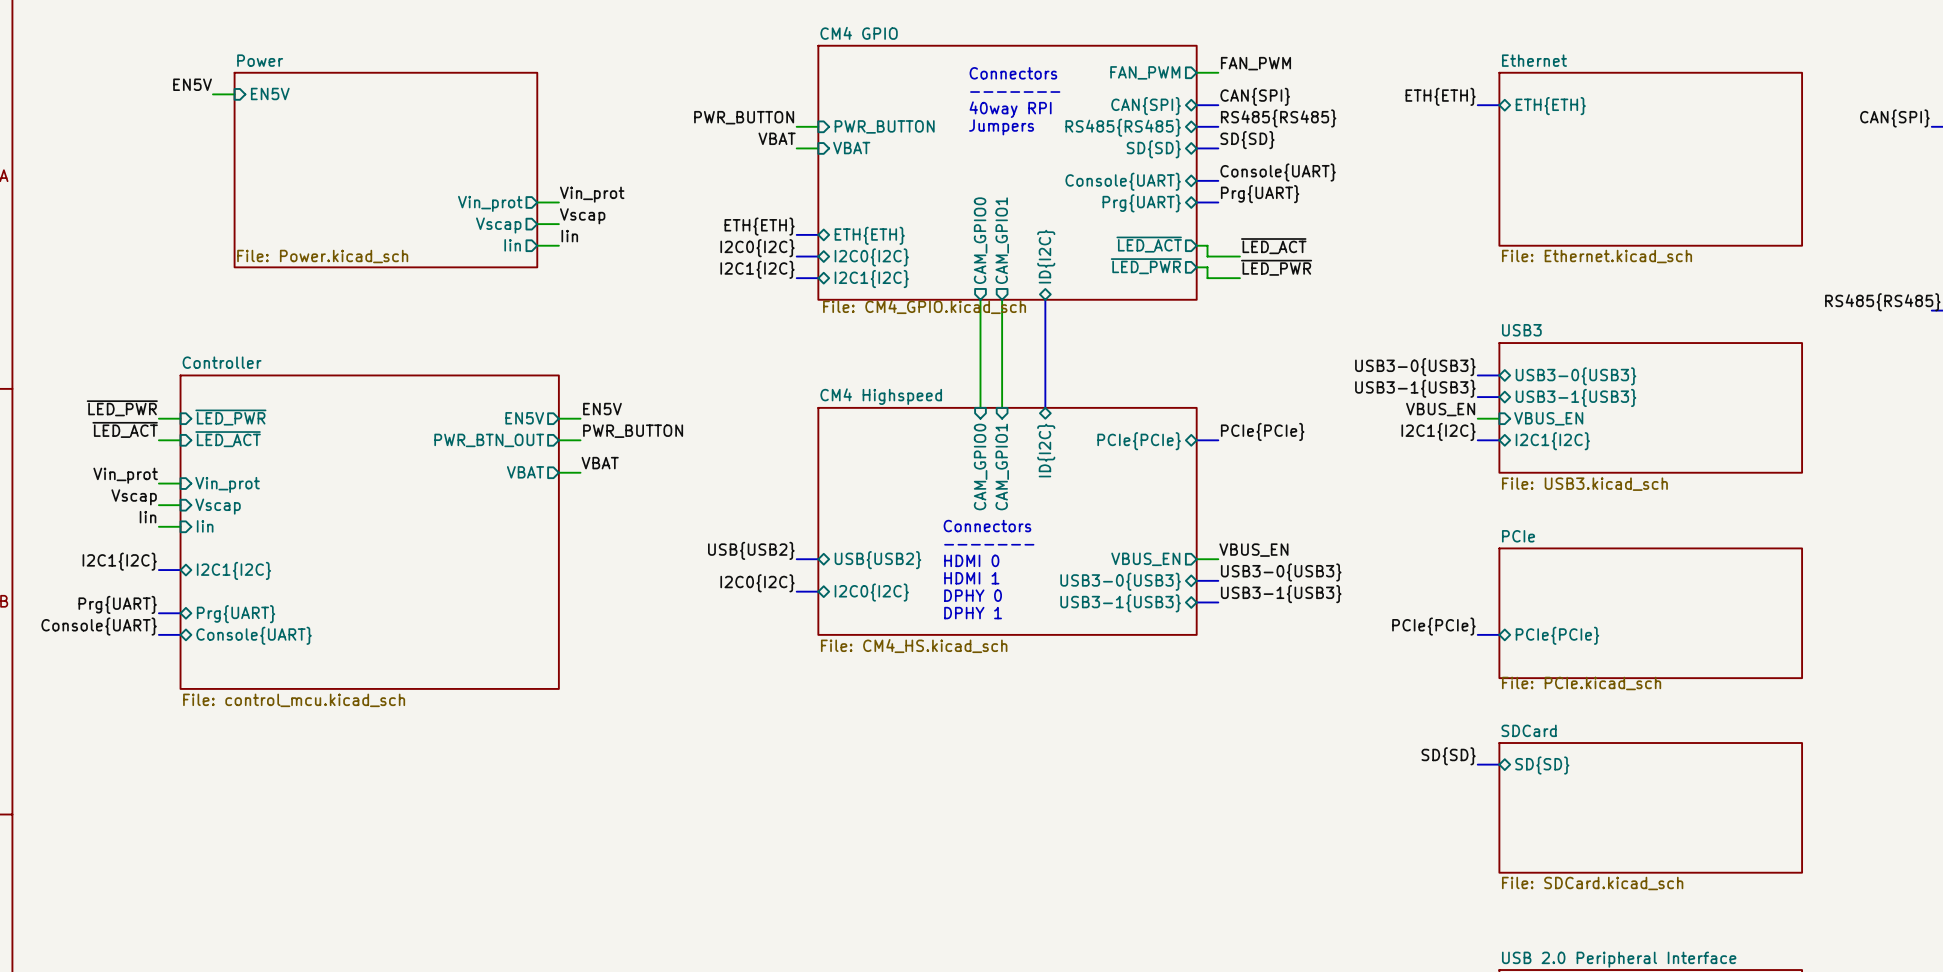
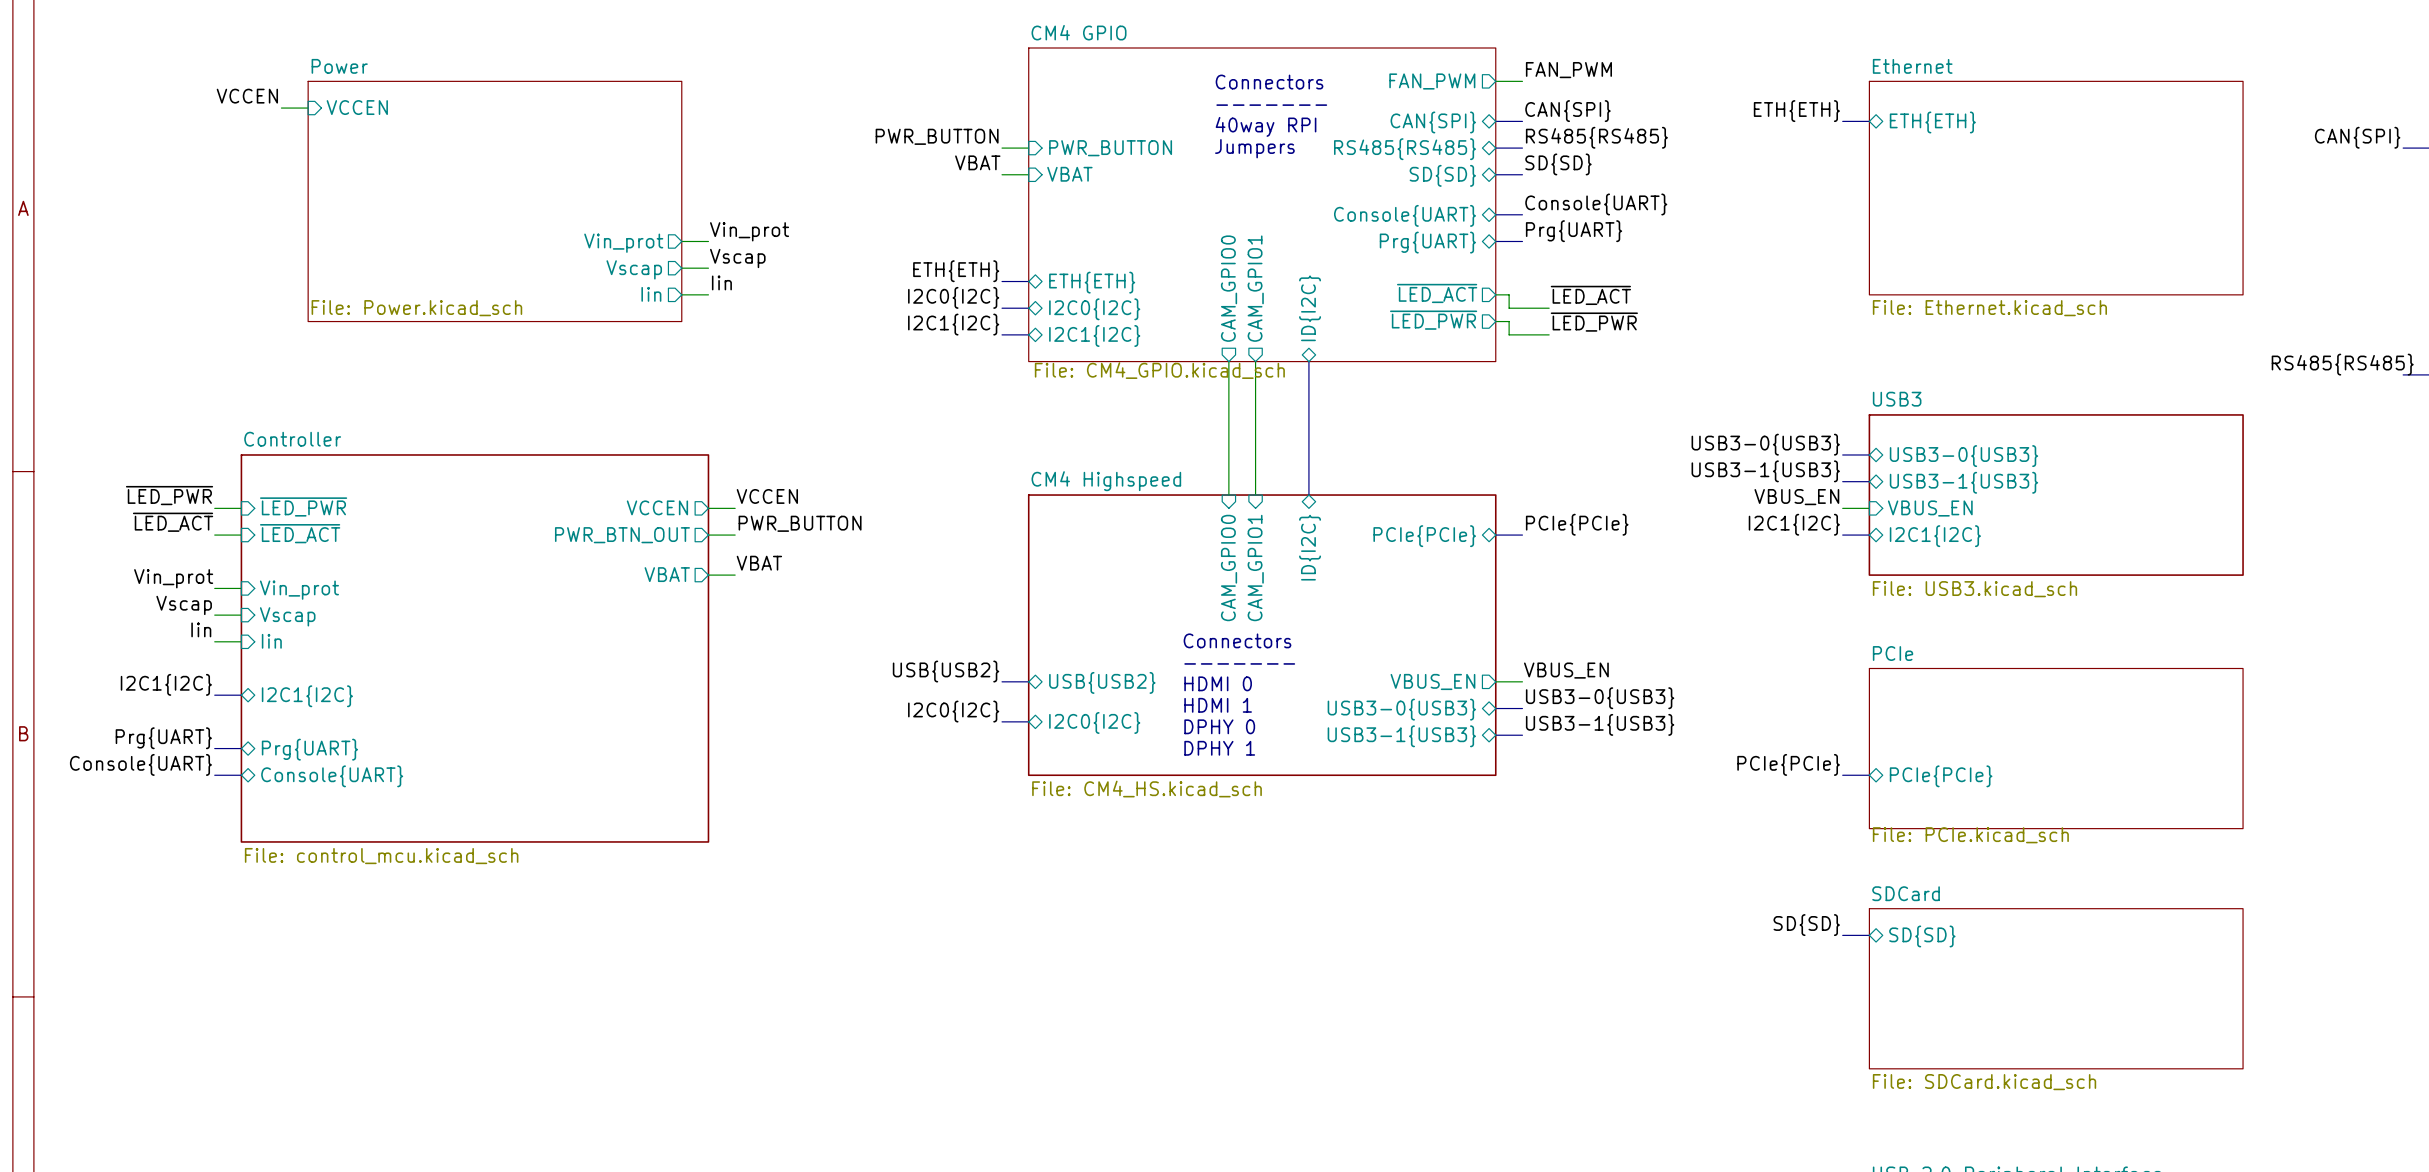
label: EN5V (192, 84) -> VCCEN (247, 96)
sheet pin: EN5V (270, 93) -> VCCEN (357, 107)
label: EN5V (602, 409) -> VCCEN (767, 496)
sheet pin: EN5V (524, 418) -> VCCEN (657, 507)

